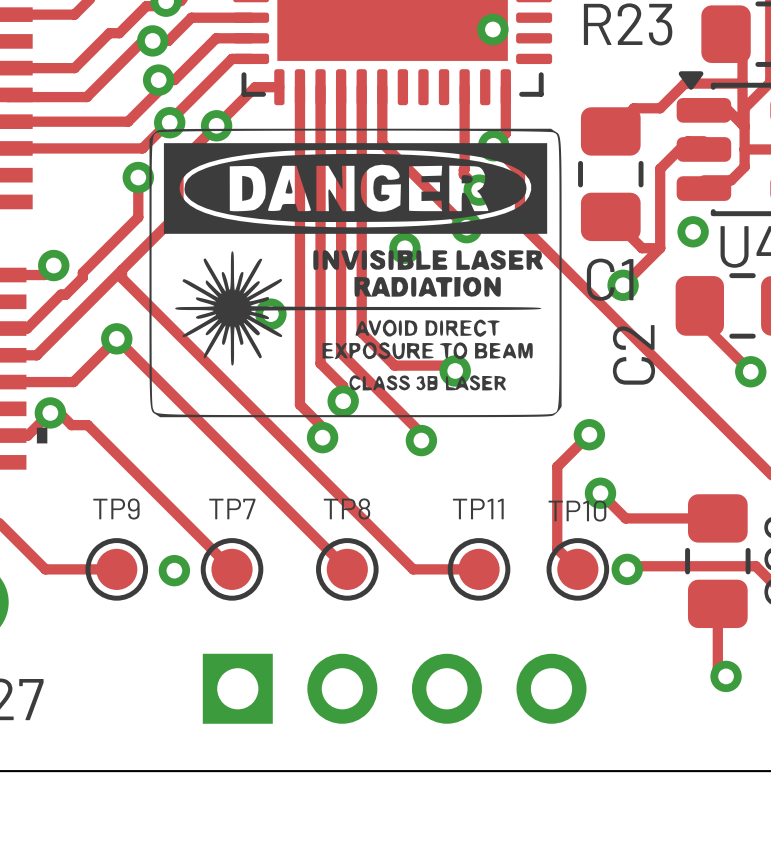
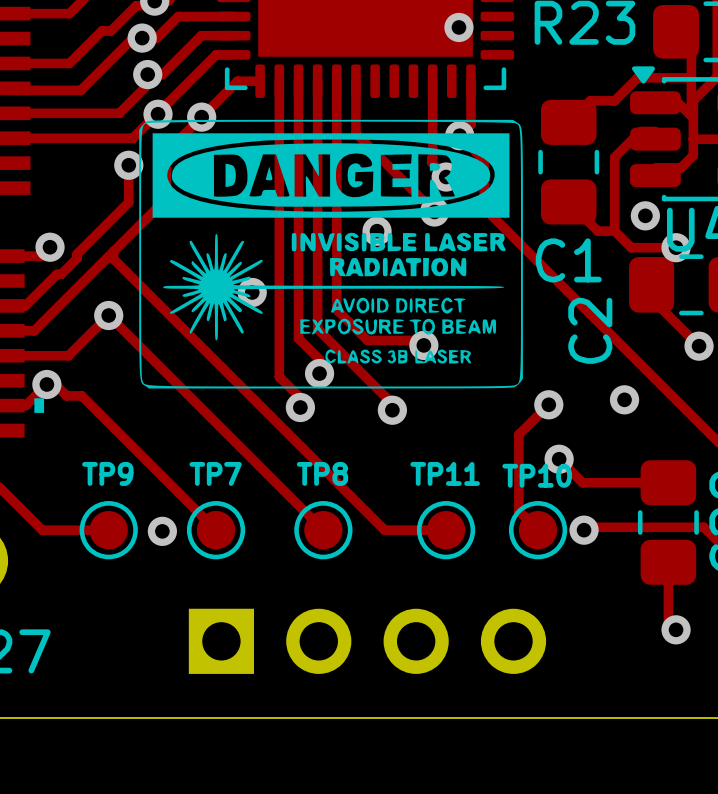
track: (660, 248) (623, 285) -> (614, 231) (631, 247) (676, 247)
via: none -> (676, 247)
via: (623, 285) -> none
via: none -> (624, 399)

